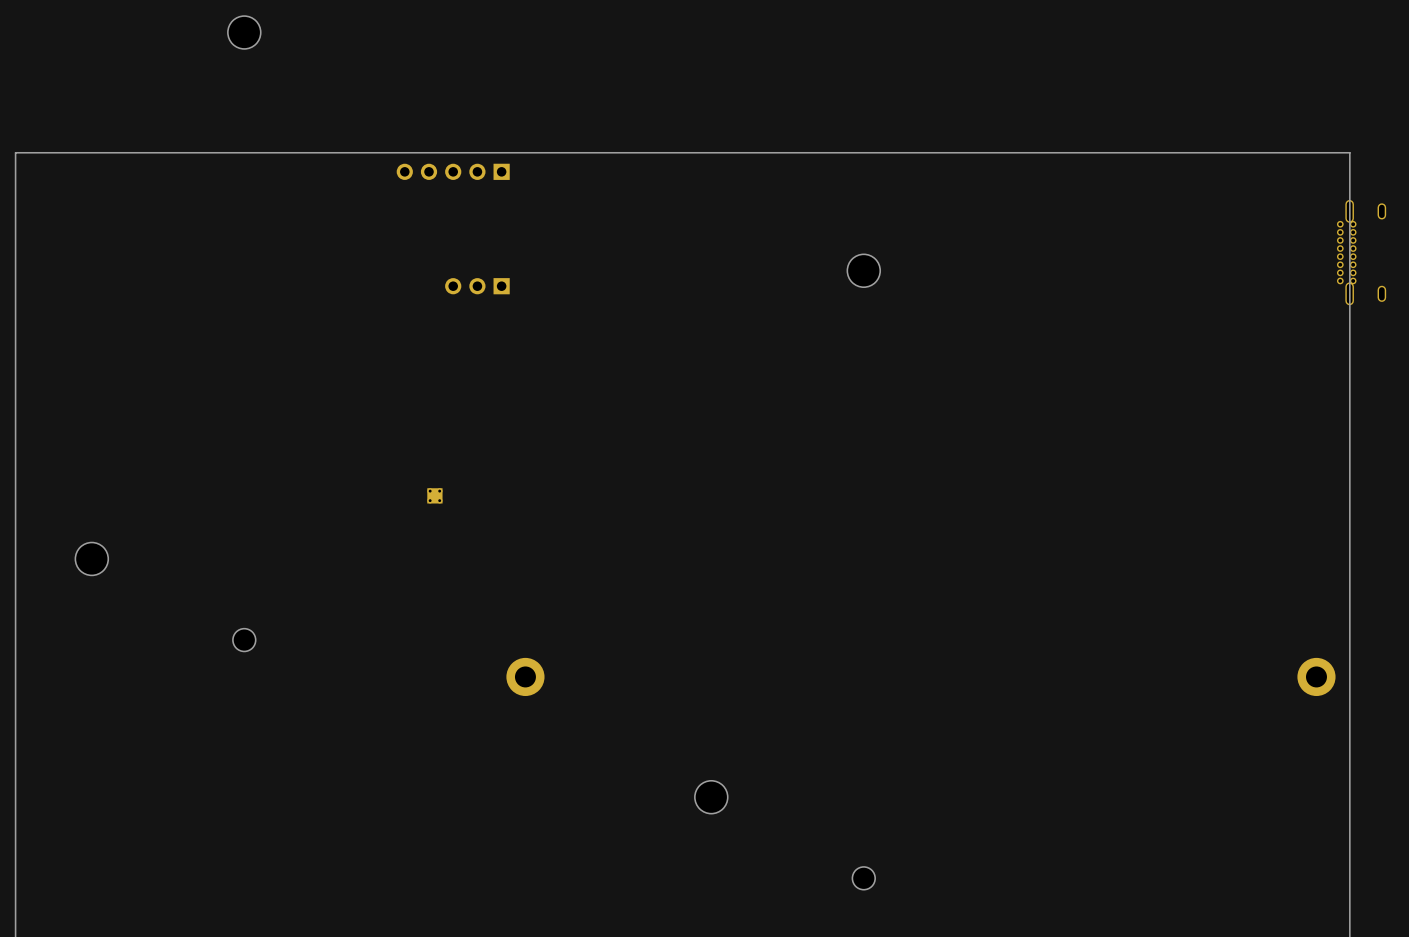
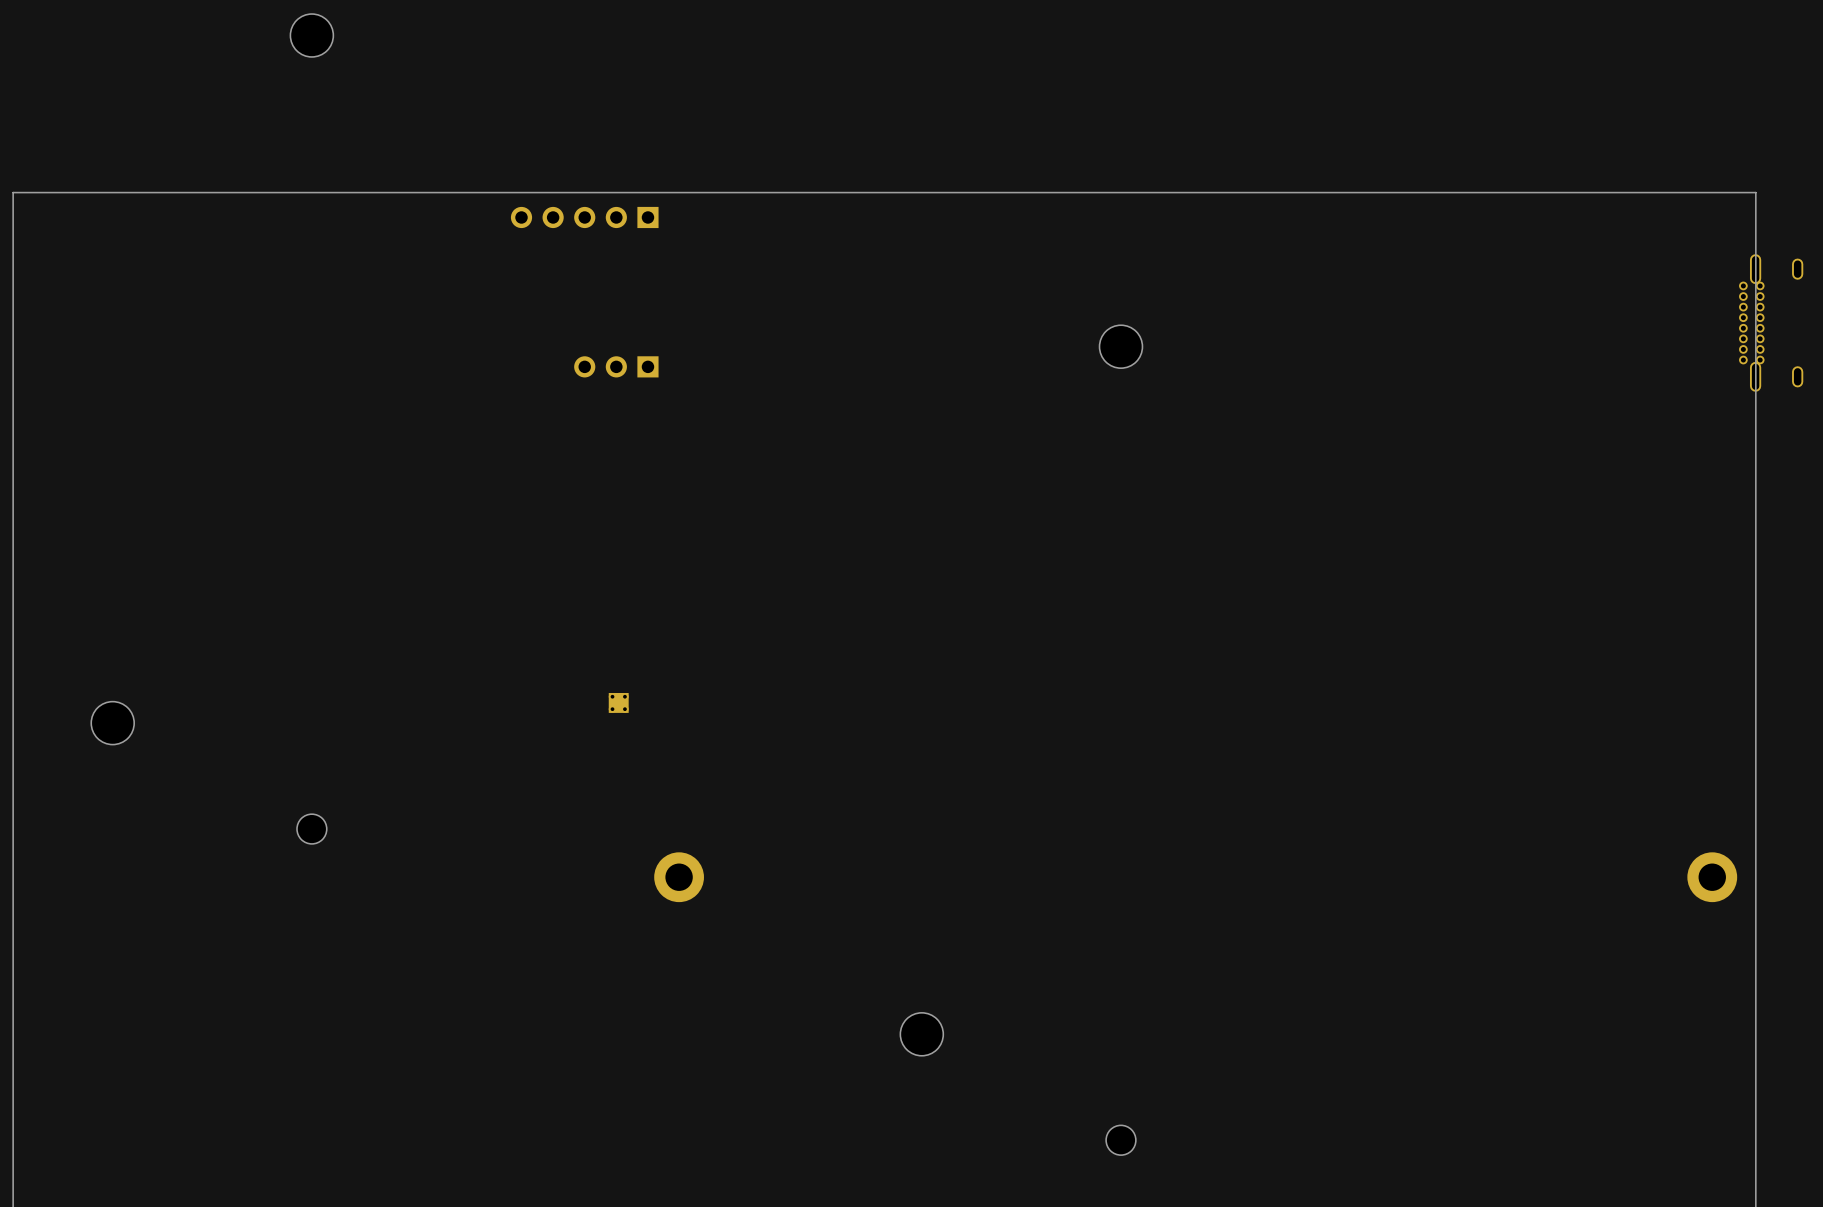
part position: (434, 495) -> (618, 702)

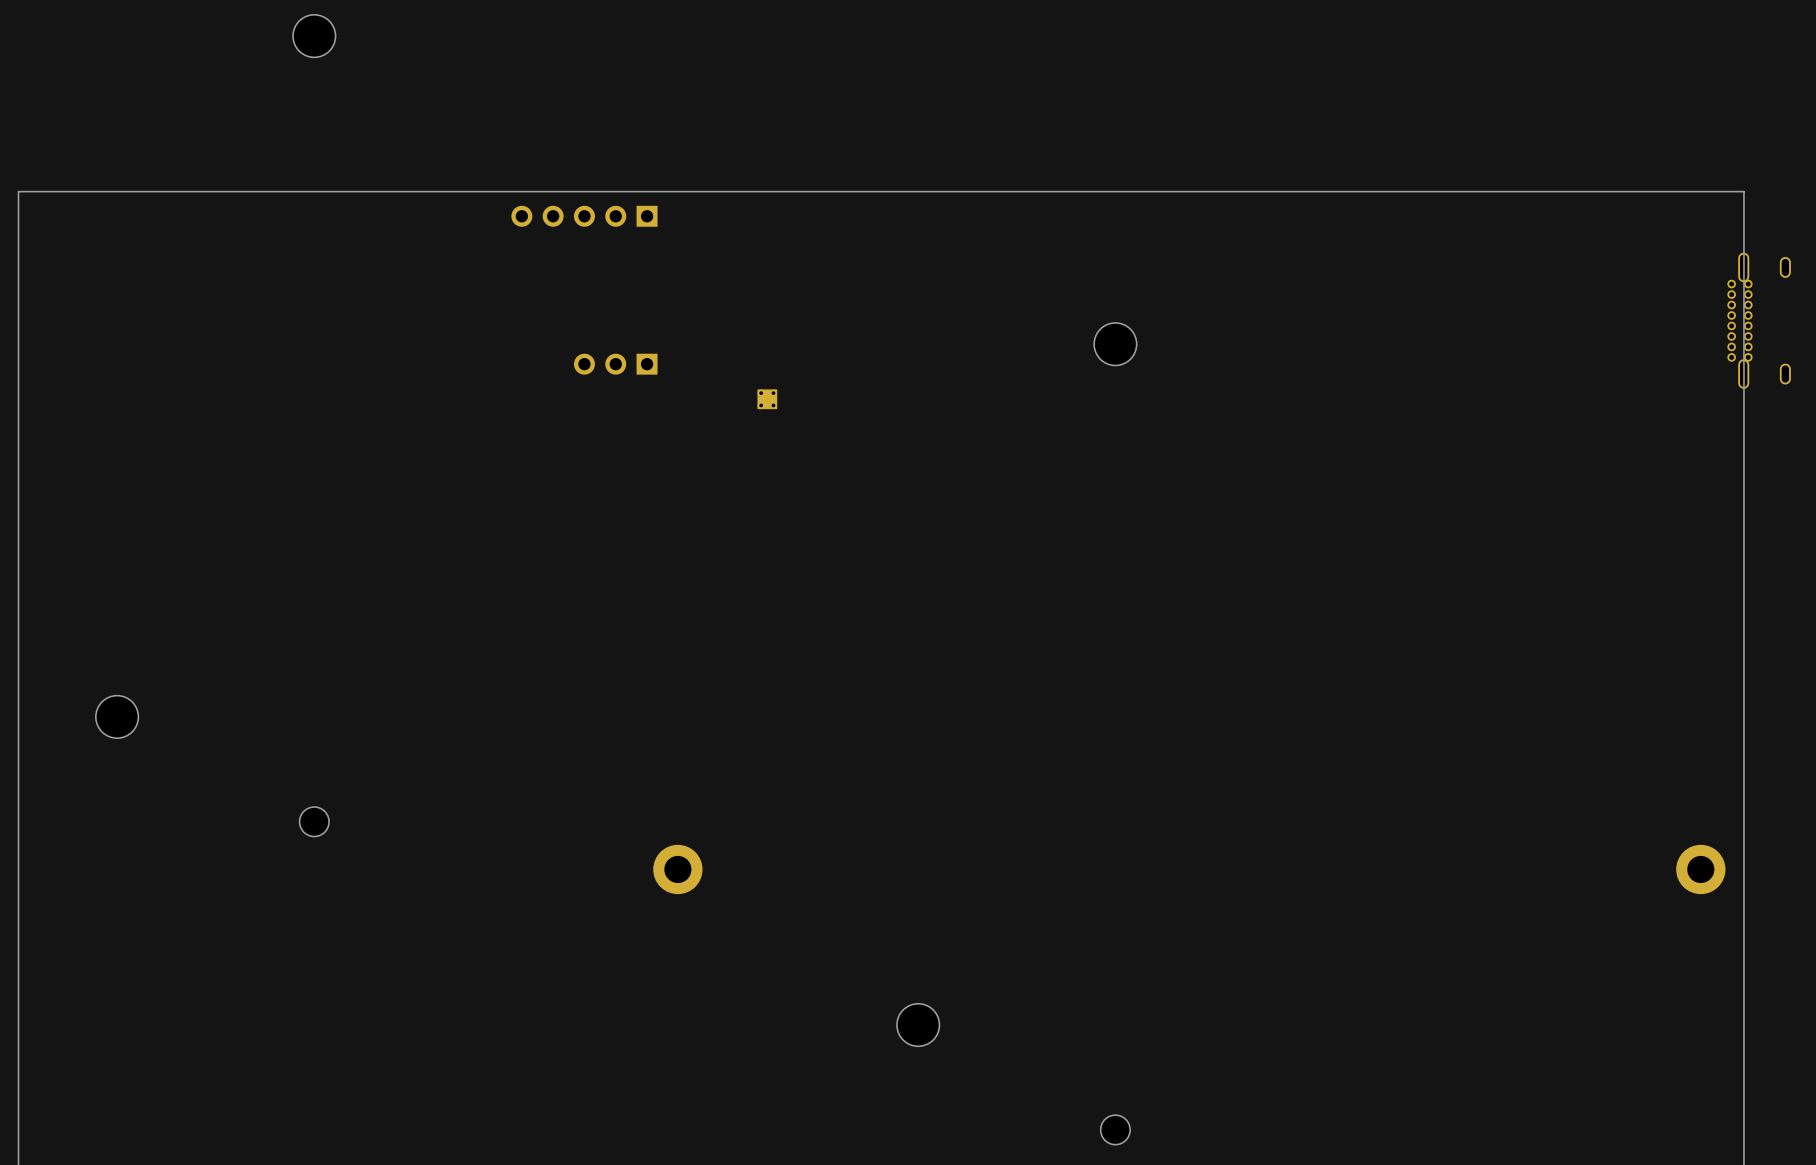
part: none -> (767, 399)
part: (618, 702) -> none

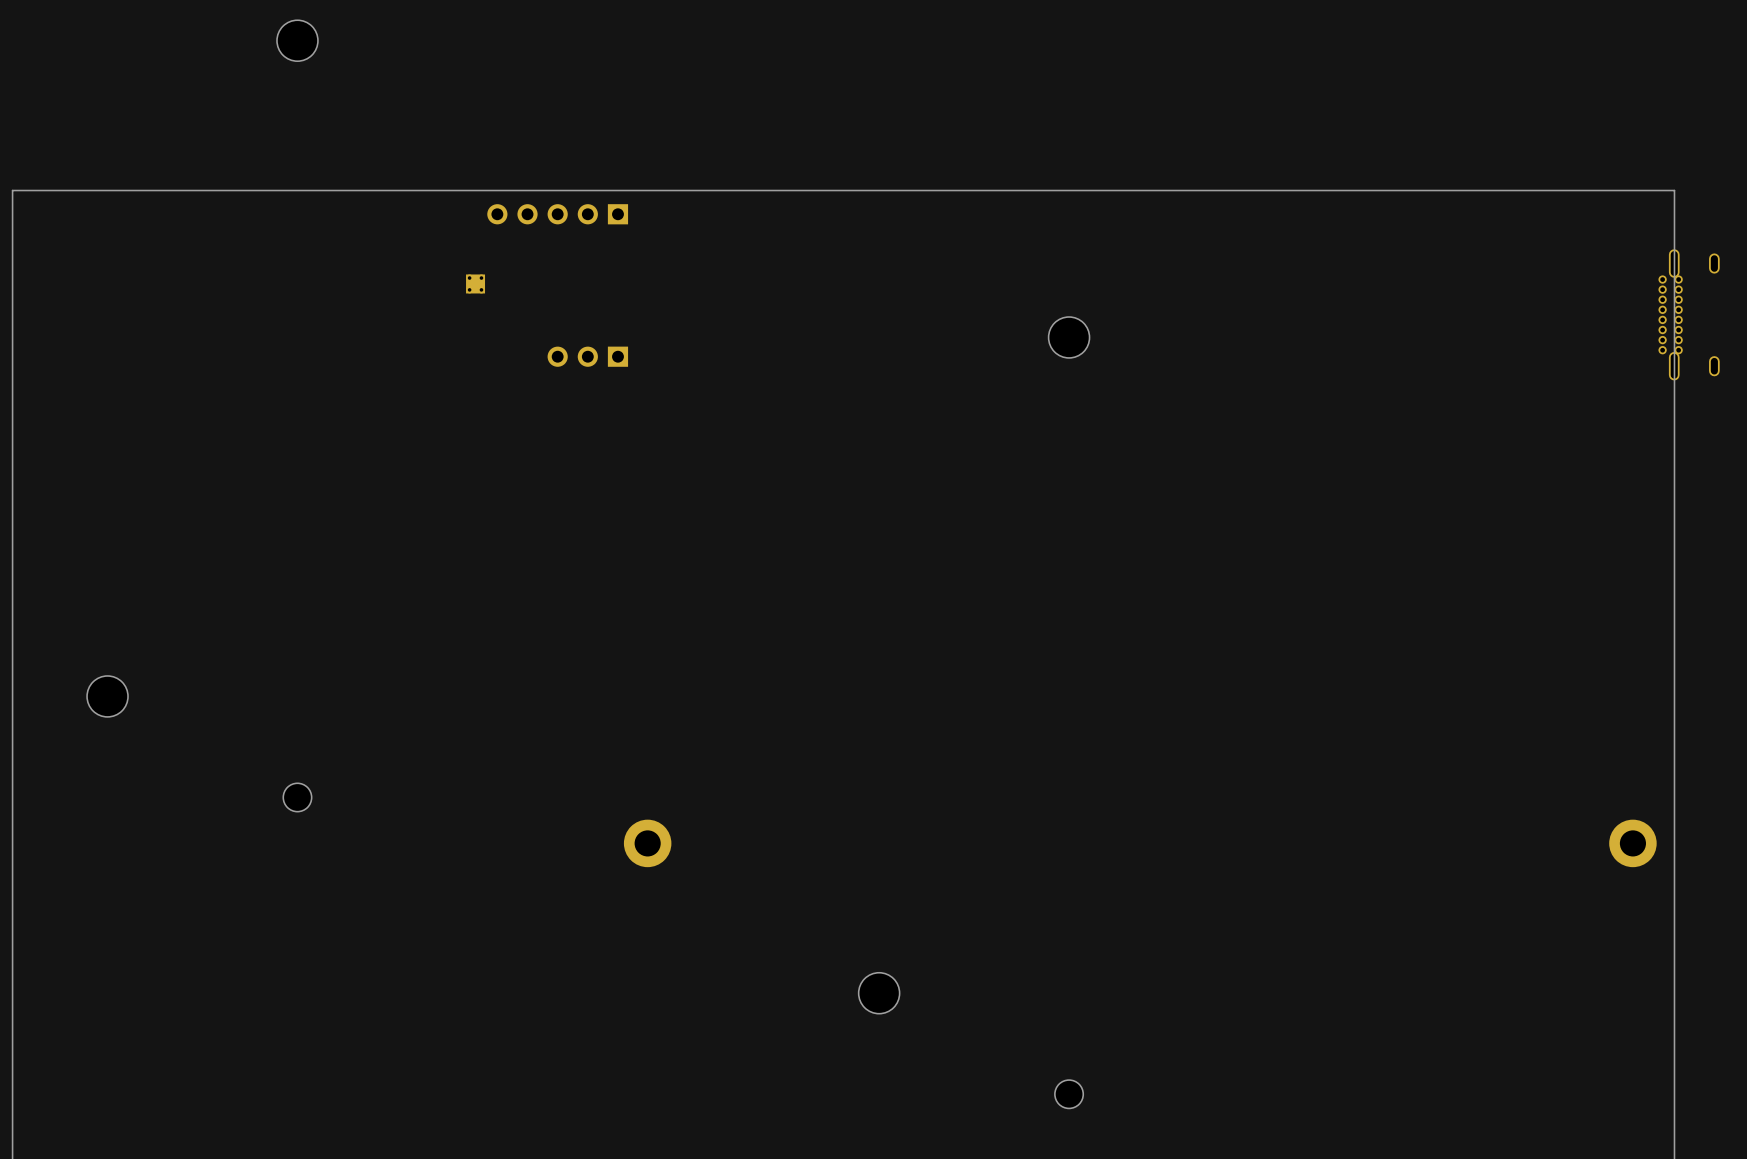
part position: (767, 399) -> (475, 283)

